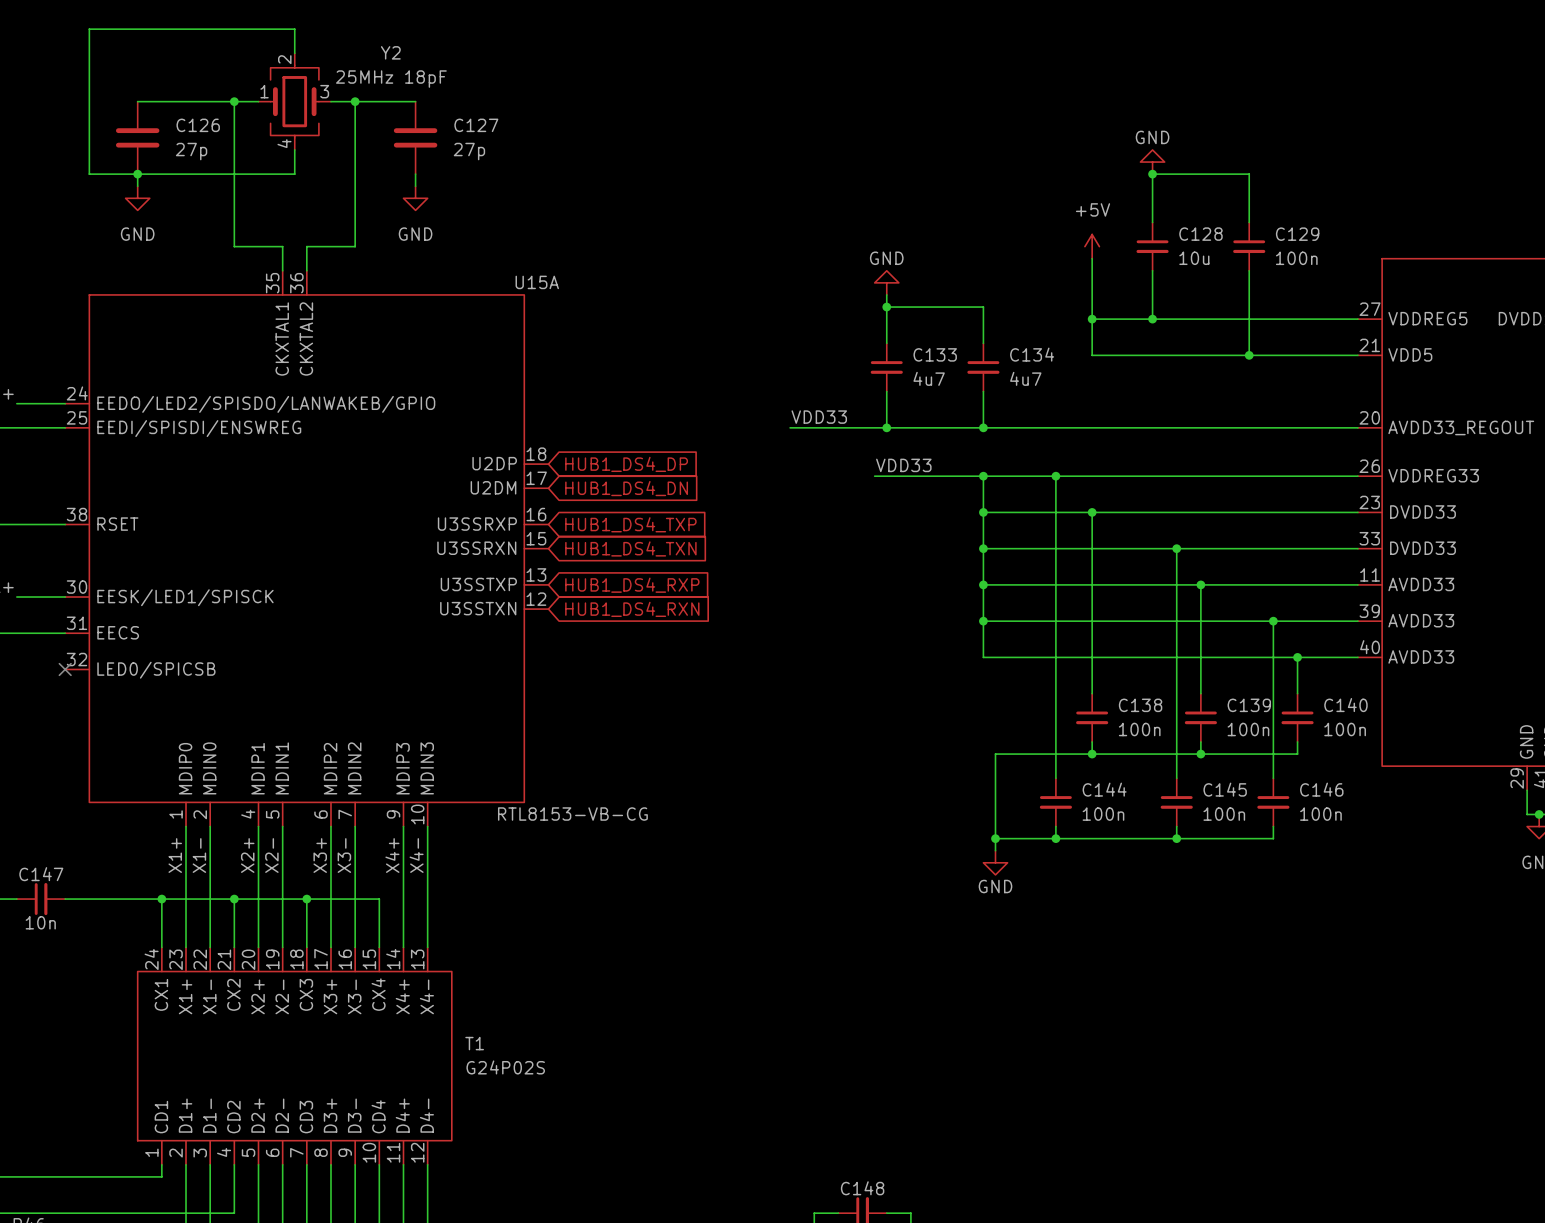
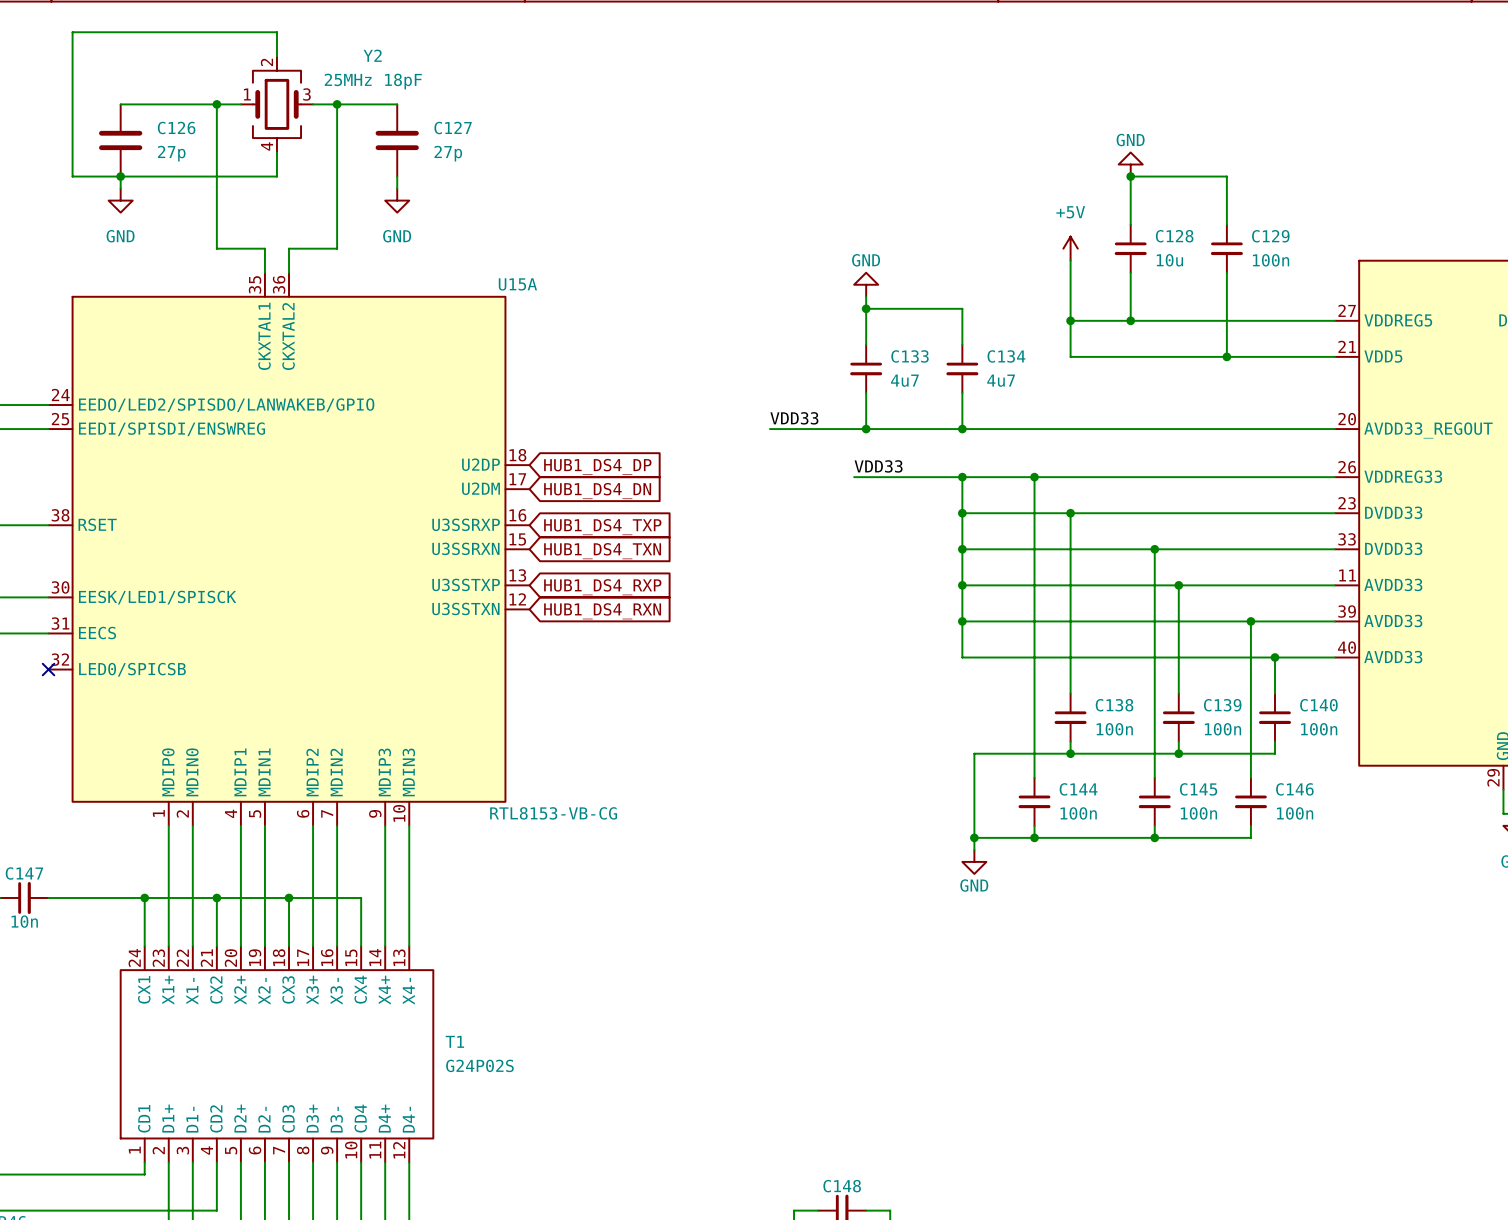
label: X1+ (175, 855) -> none
label: X1- (199, 855) -> none
label: X2+ (247, 855) -> none
label: X2- (271, 855) -> none
label: X3+ (320, 855) -> none
label: X3- (344, 855) -> none
label: X4+ (392, 855) -> none
label: X4- (416, 855) -> none

